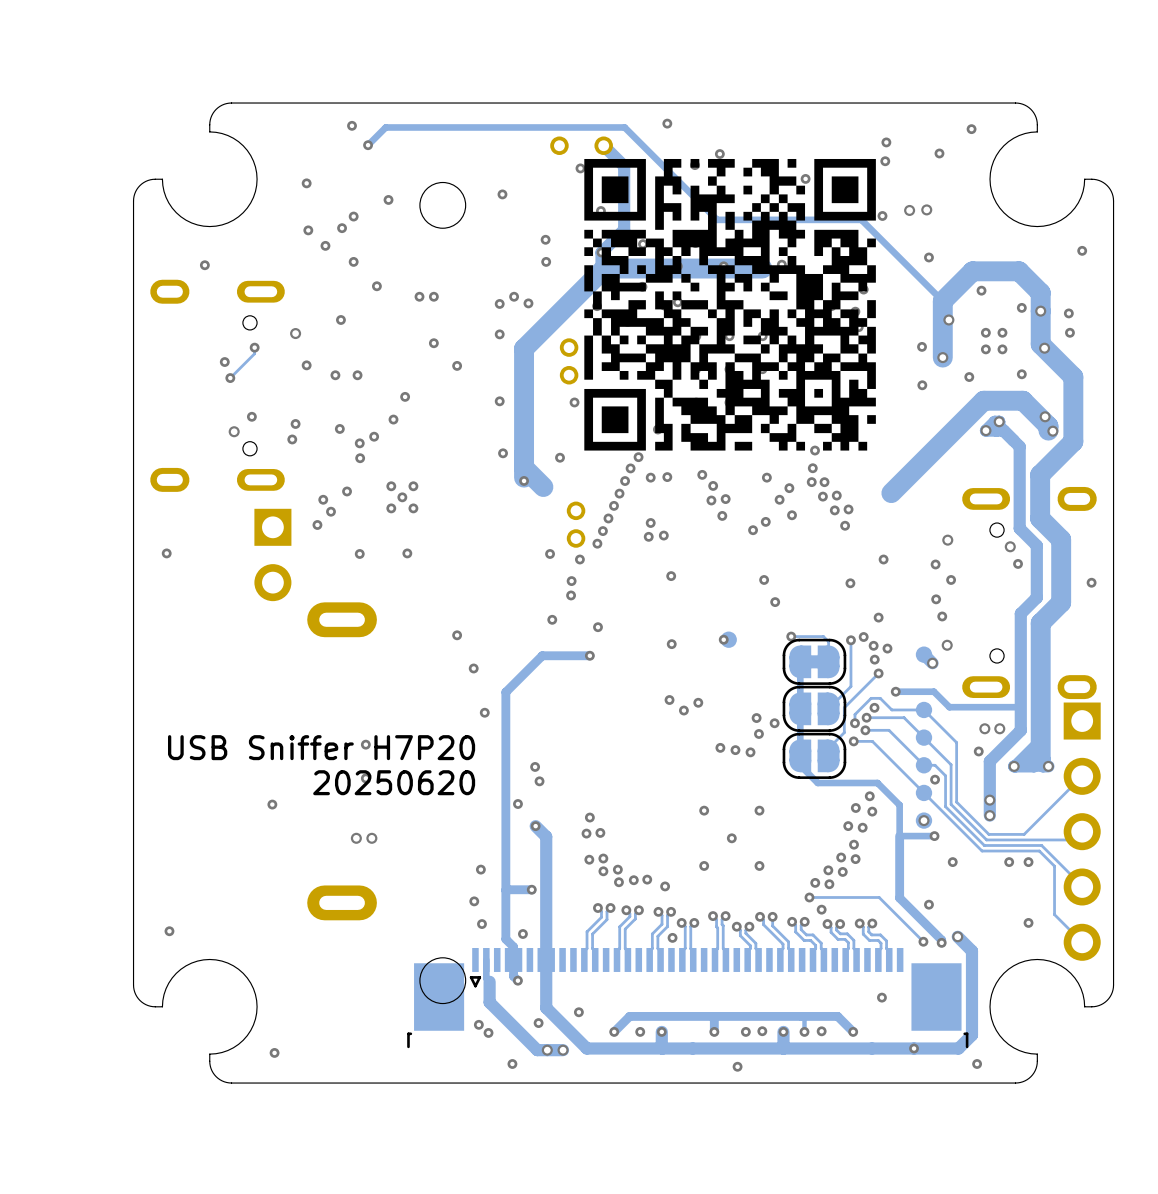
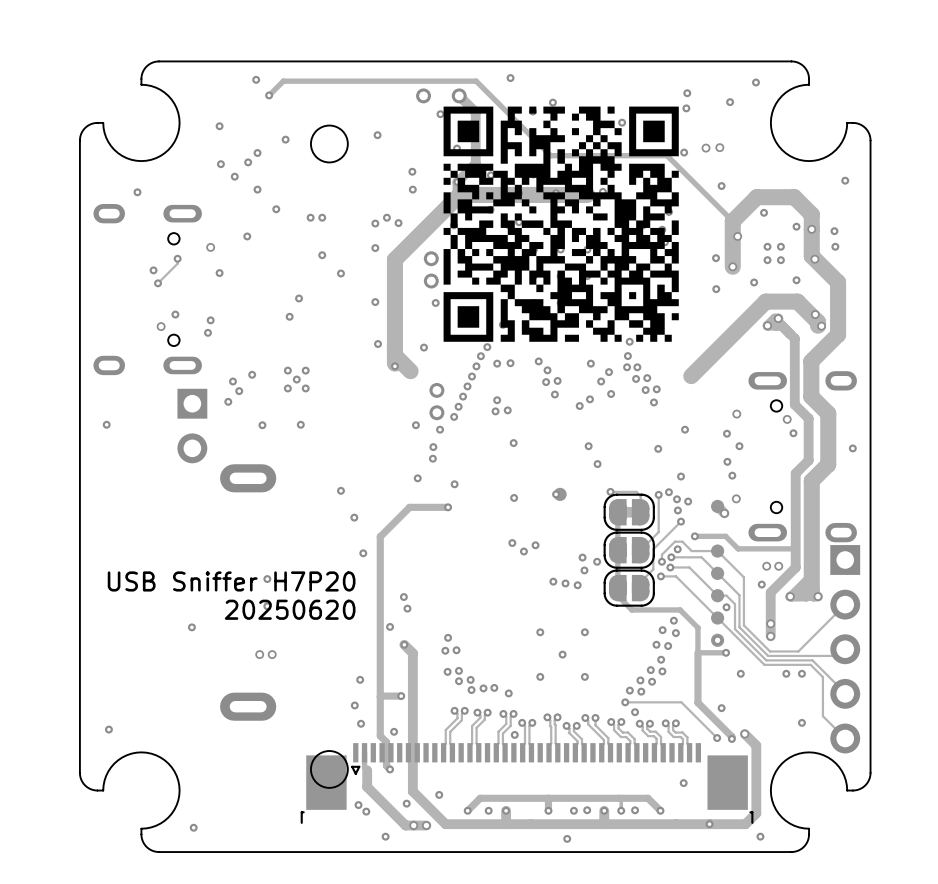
via: (335, 375) -> none
via: (357, 375) -> none
via: (339, 428) -> none
via: (374, 436) -> none
via: (359, 443) -> none
via: (360, 458) -> none

